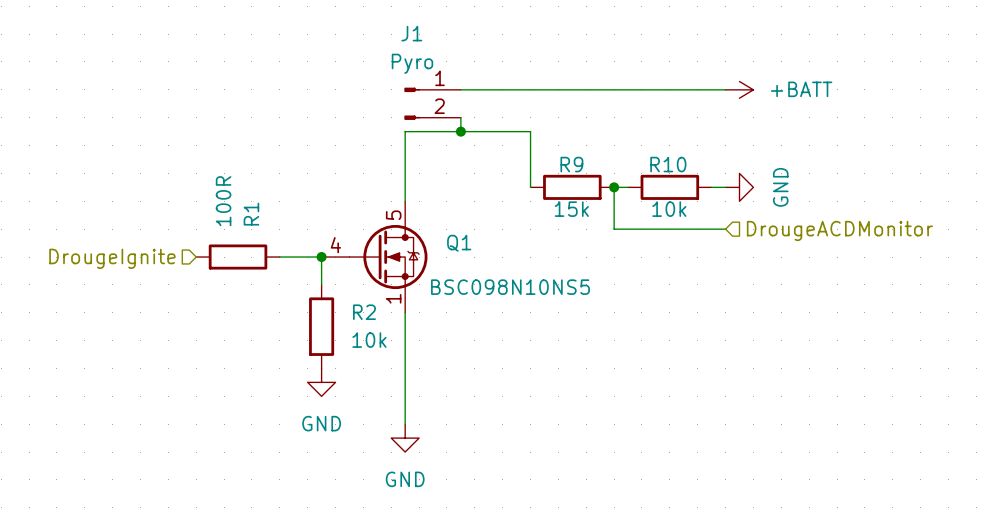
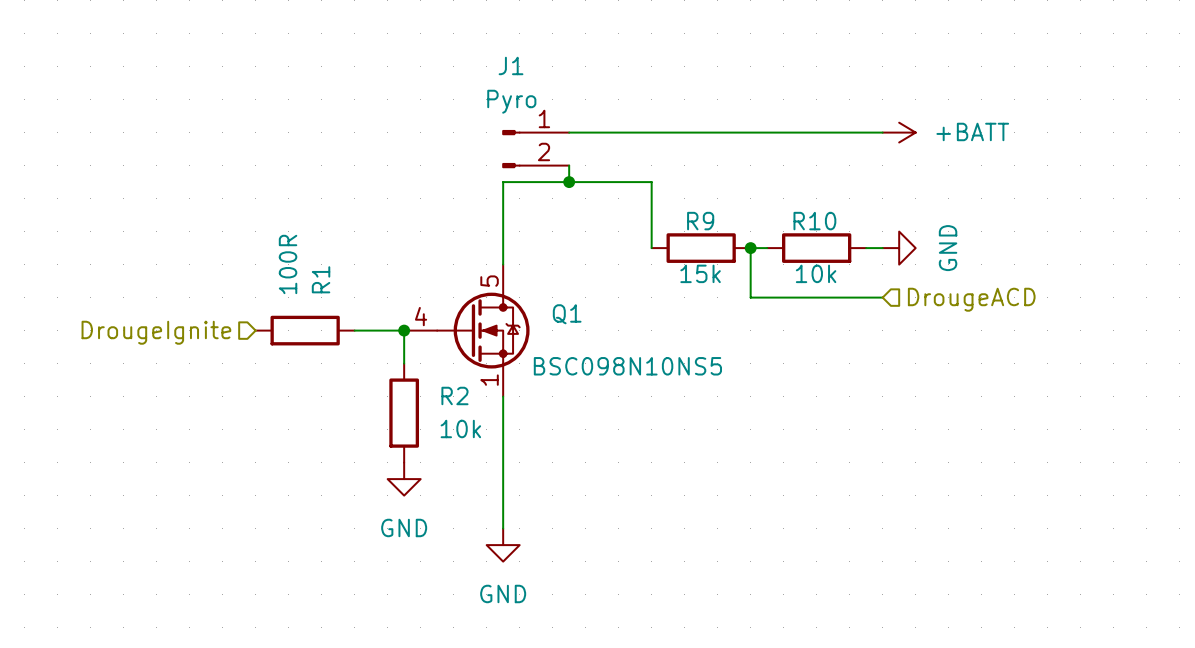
hierarchical label: DrougeACDMonitor (839, 230) -> DrougeACD (971, 299)

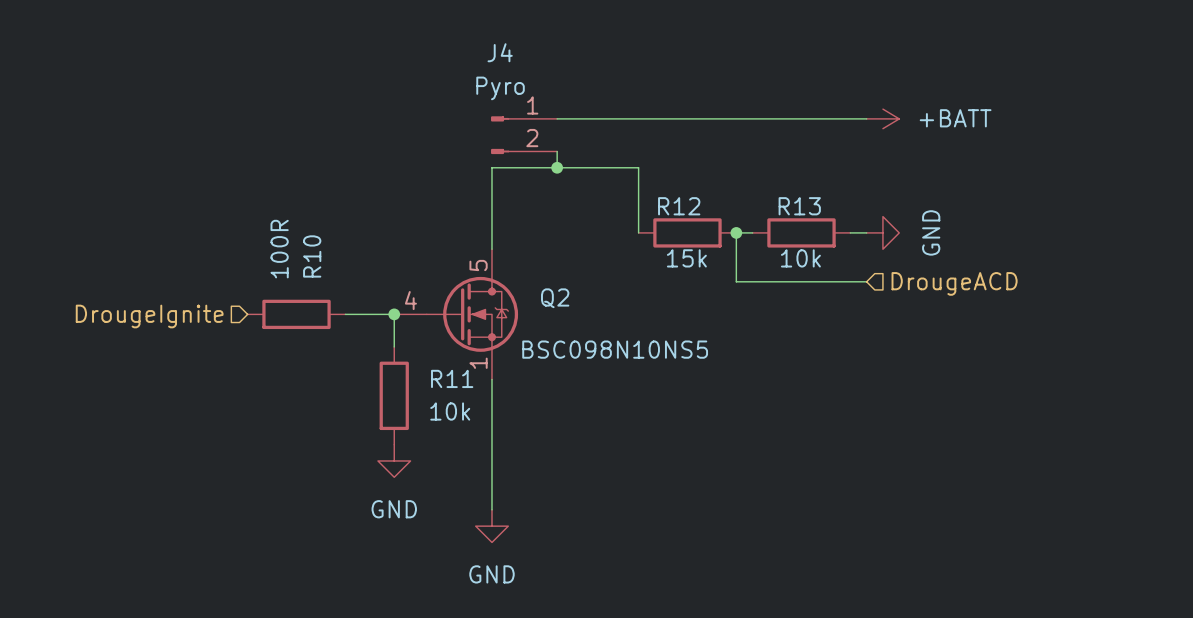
J1 name: J1 (511, 65) -> J4 (500, 52)
R9 name: R9 (700, 221) -> R12 (679, 206)
R10 name: R10 (814, 221) -> R13 (799, 206)
R1 name: R1 (321, 279) -> R10 (312, 256)
Q1 name: Q1 (567, 314) -> Q2 (555, 298)
R2 name: R2 (454, 395) -> R11 (452, 378)

